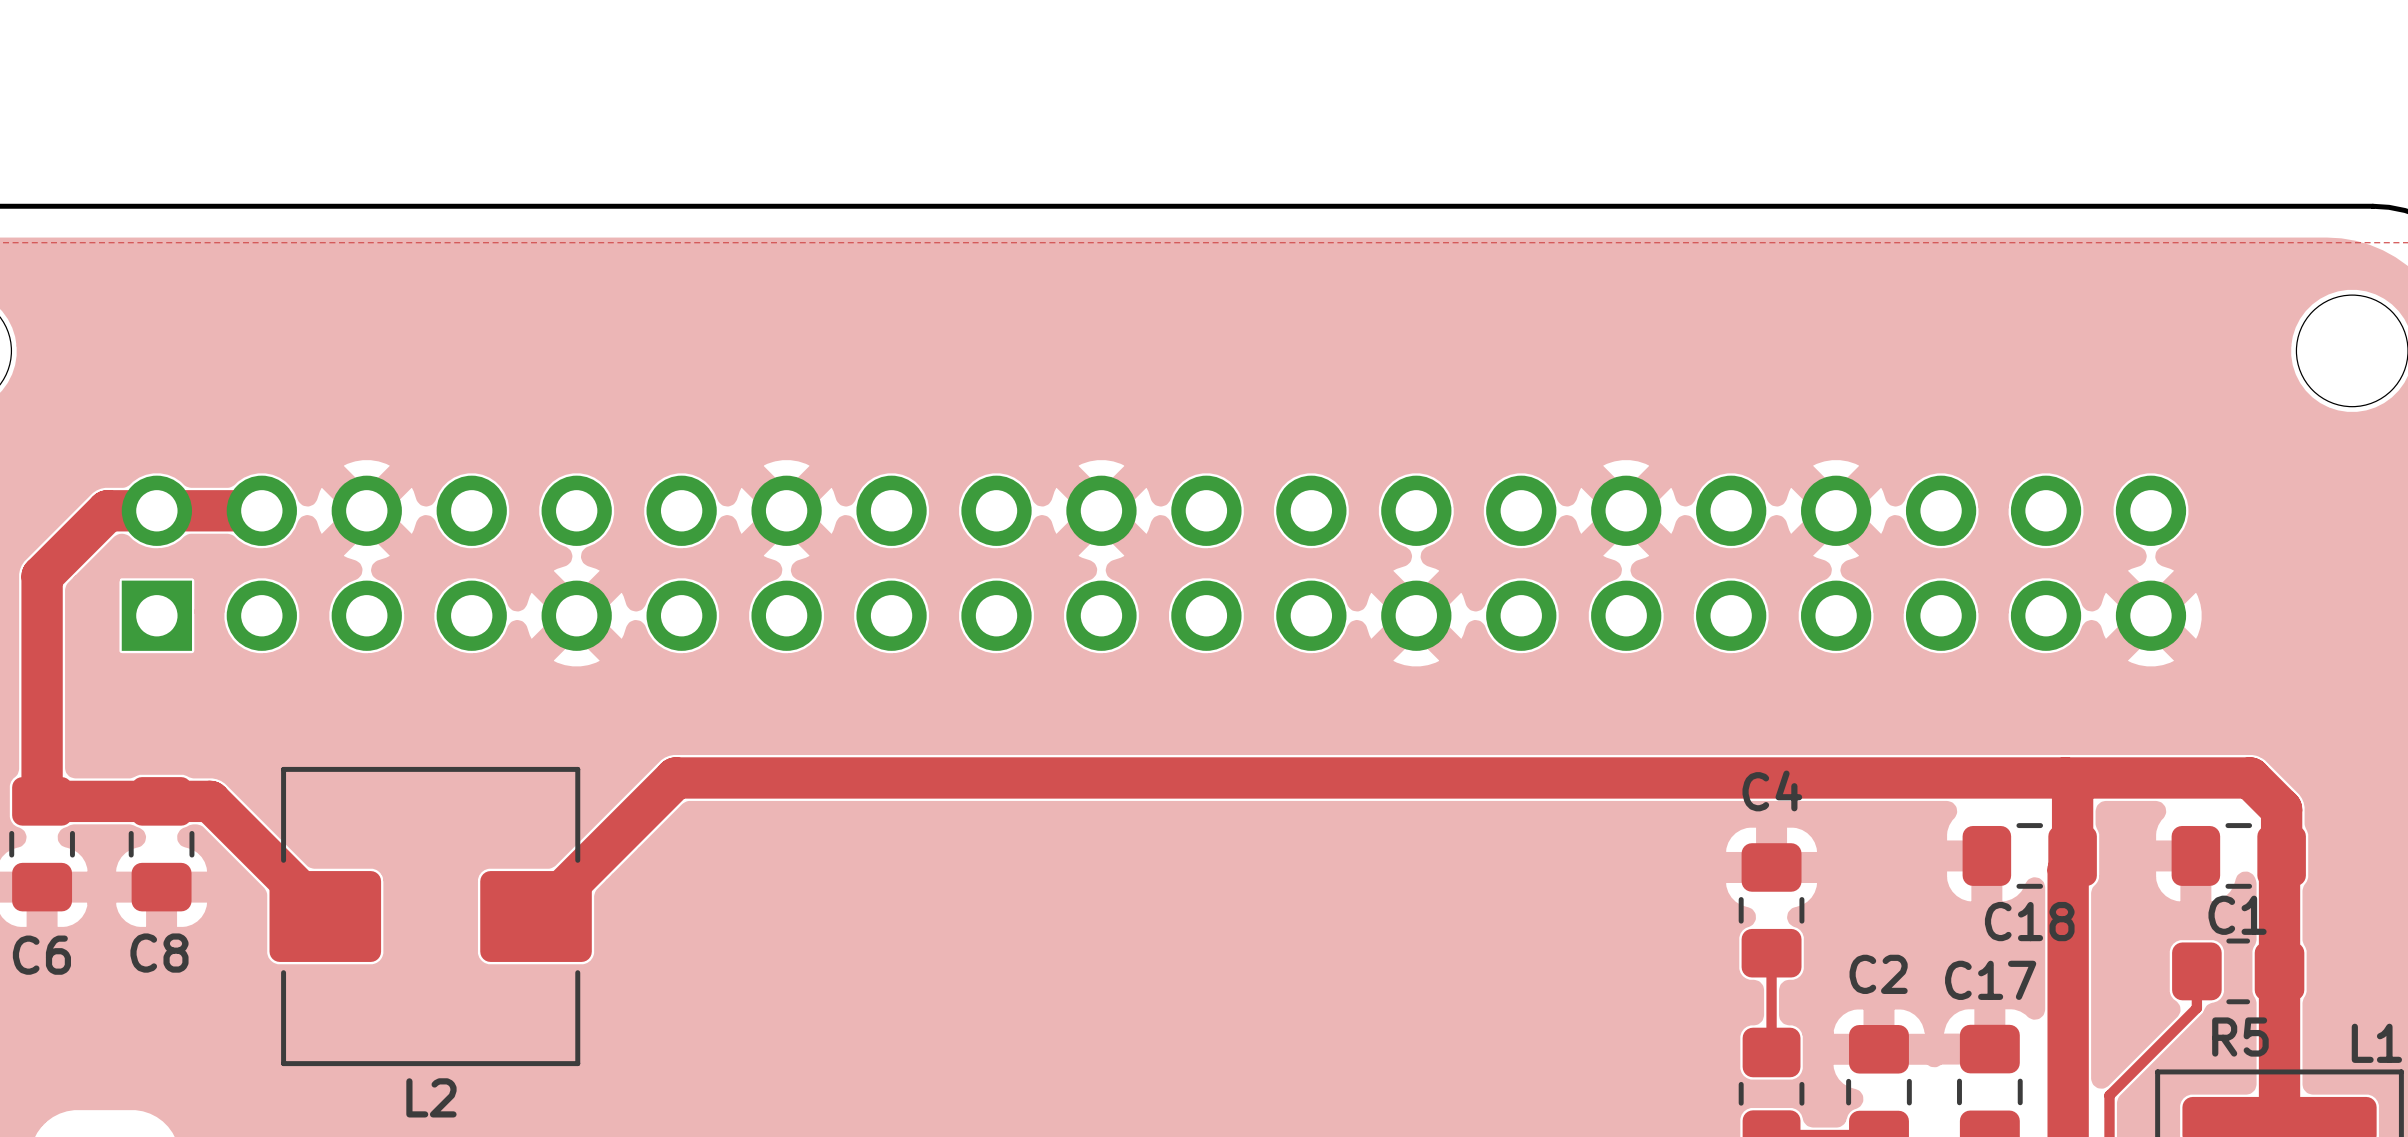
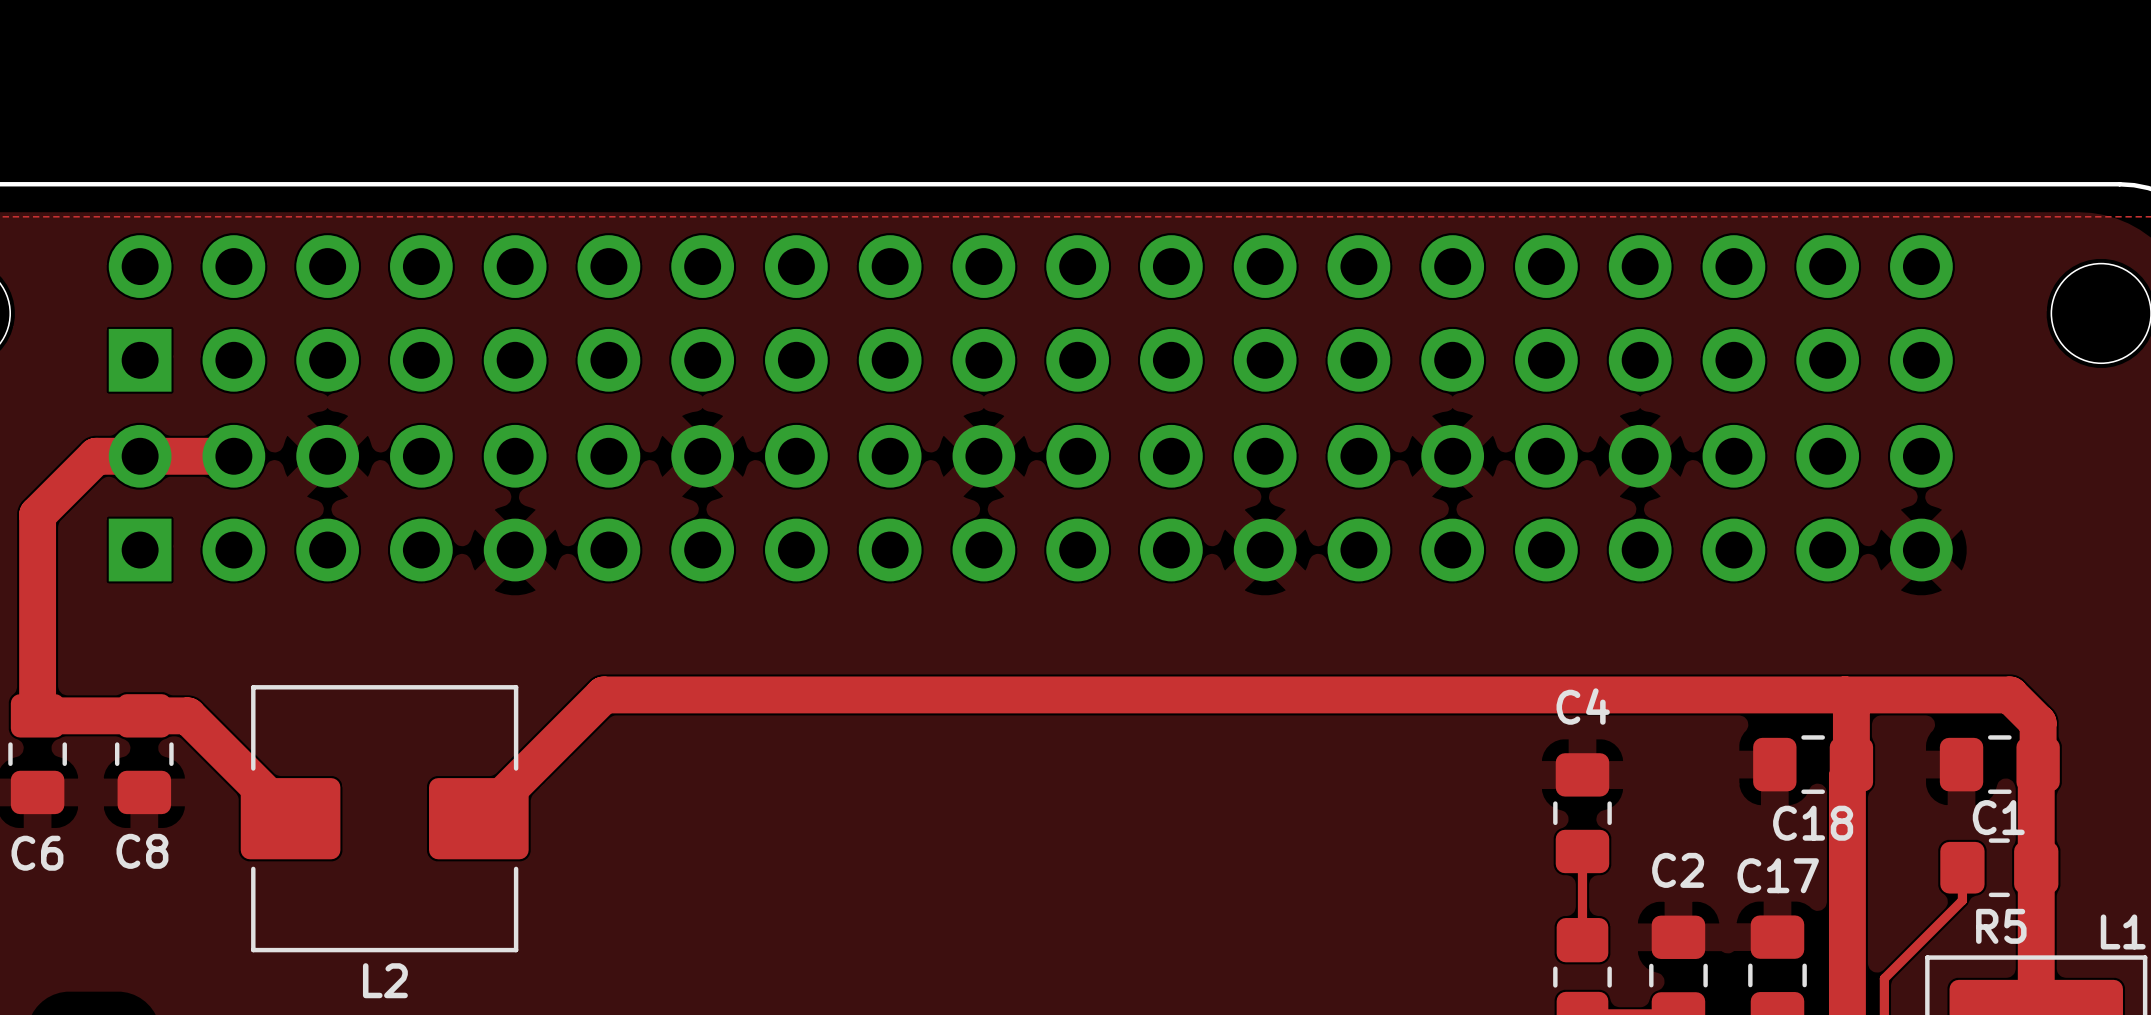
part: none -> (1030, 313)

